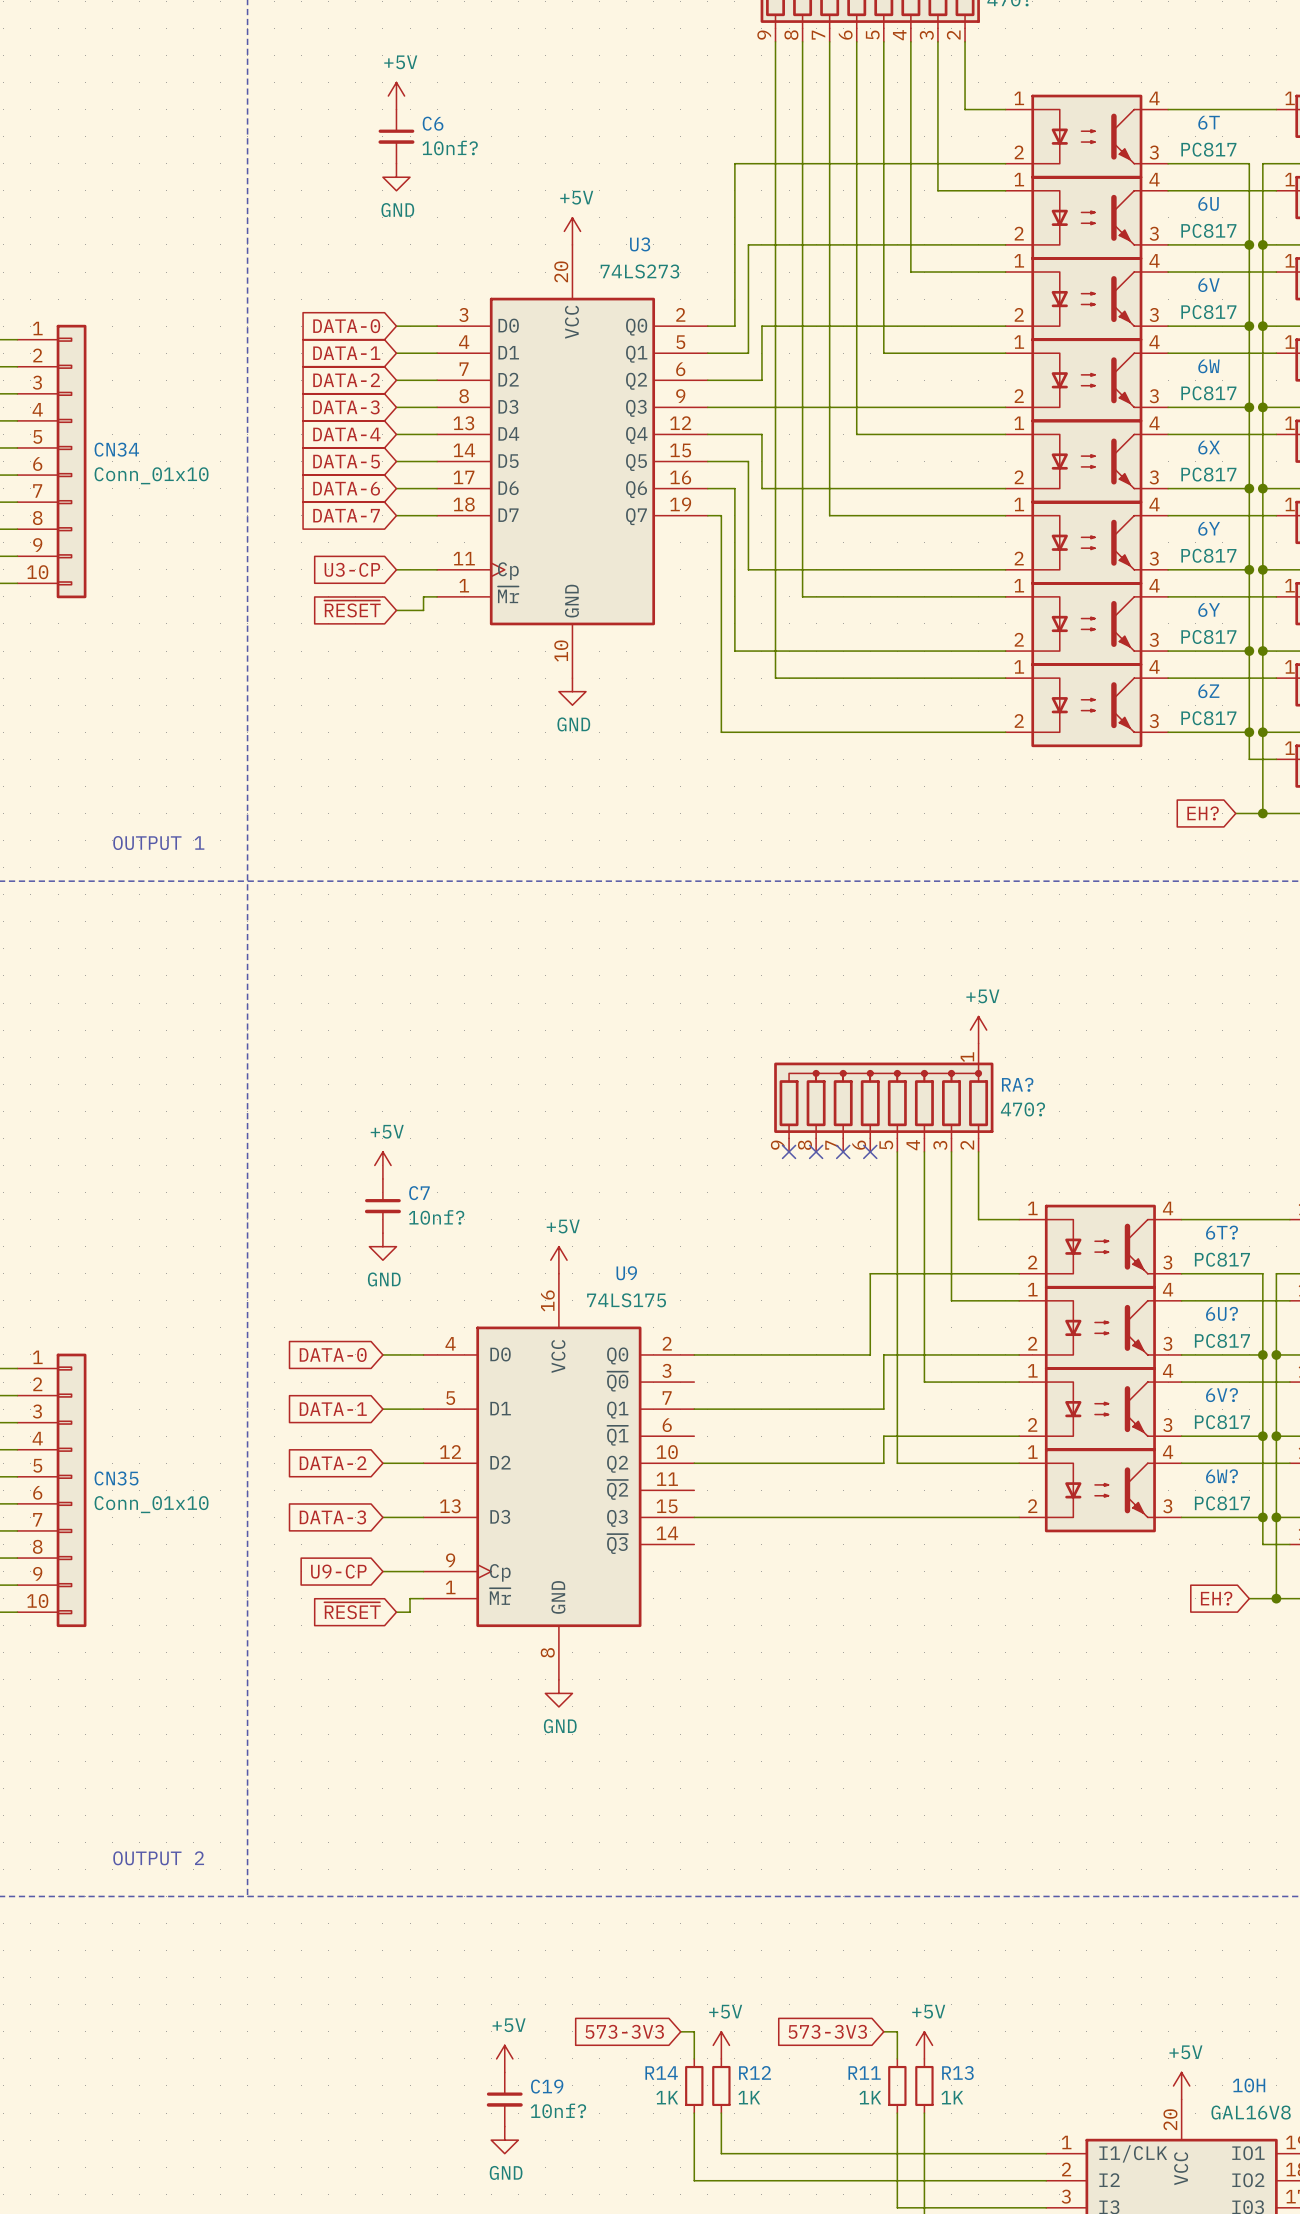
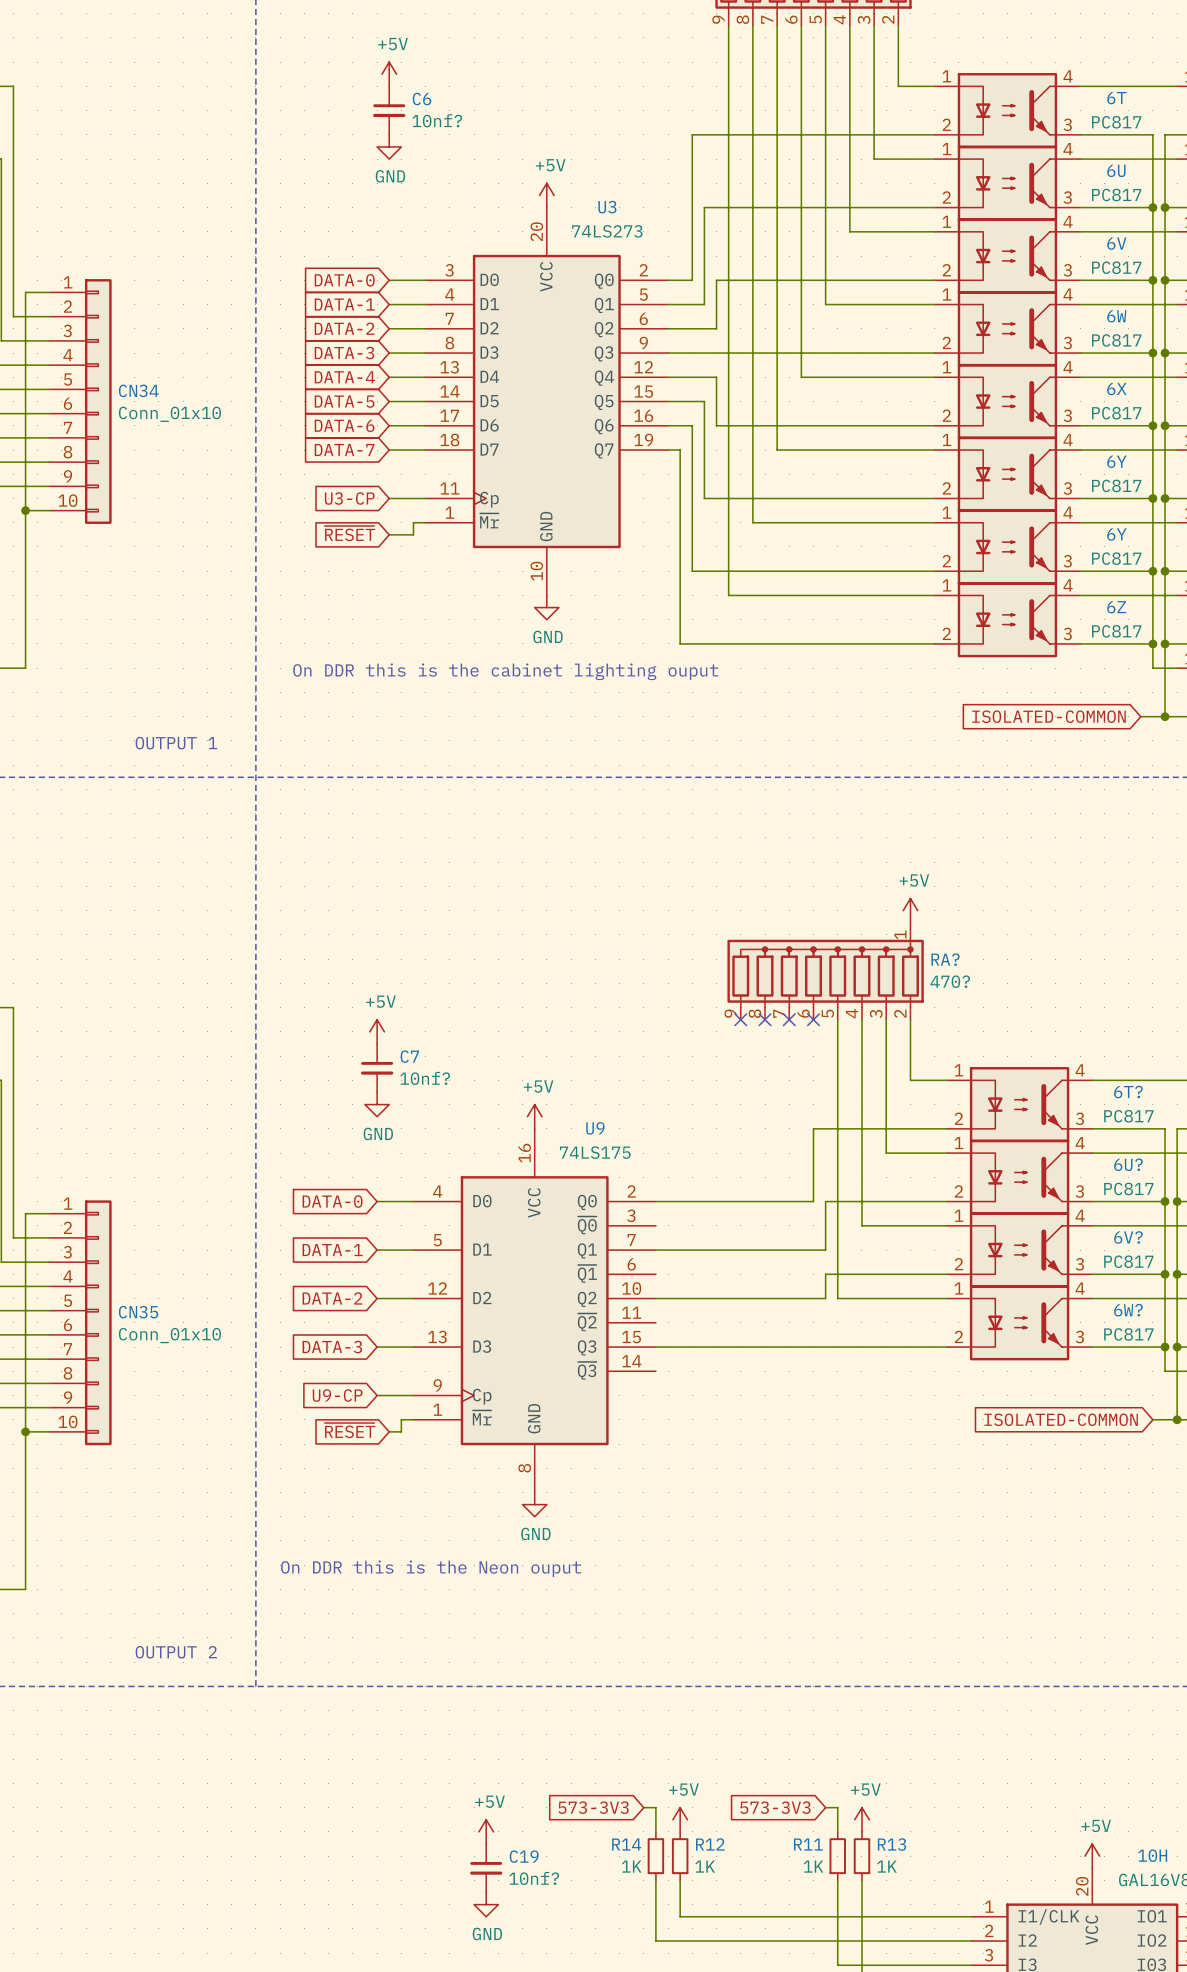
text: none -> On DDR this is the cabinet lighting ouput (505, 671)
global label: EH? (1203, 813) -> ISOLATED-COMMON (1049, 716)
global label: EH? (1216, 1598) -> ISOLATED-COMMON (1061, 1419)
text: none -> On DDR this is the Neon ouput (431, 1568)

